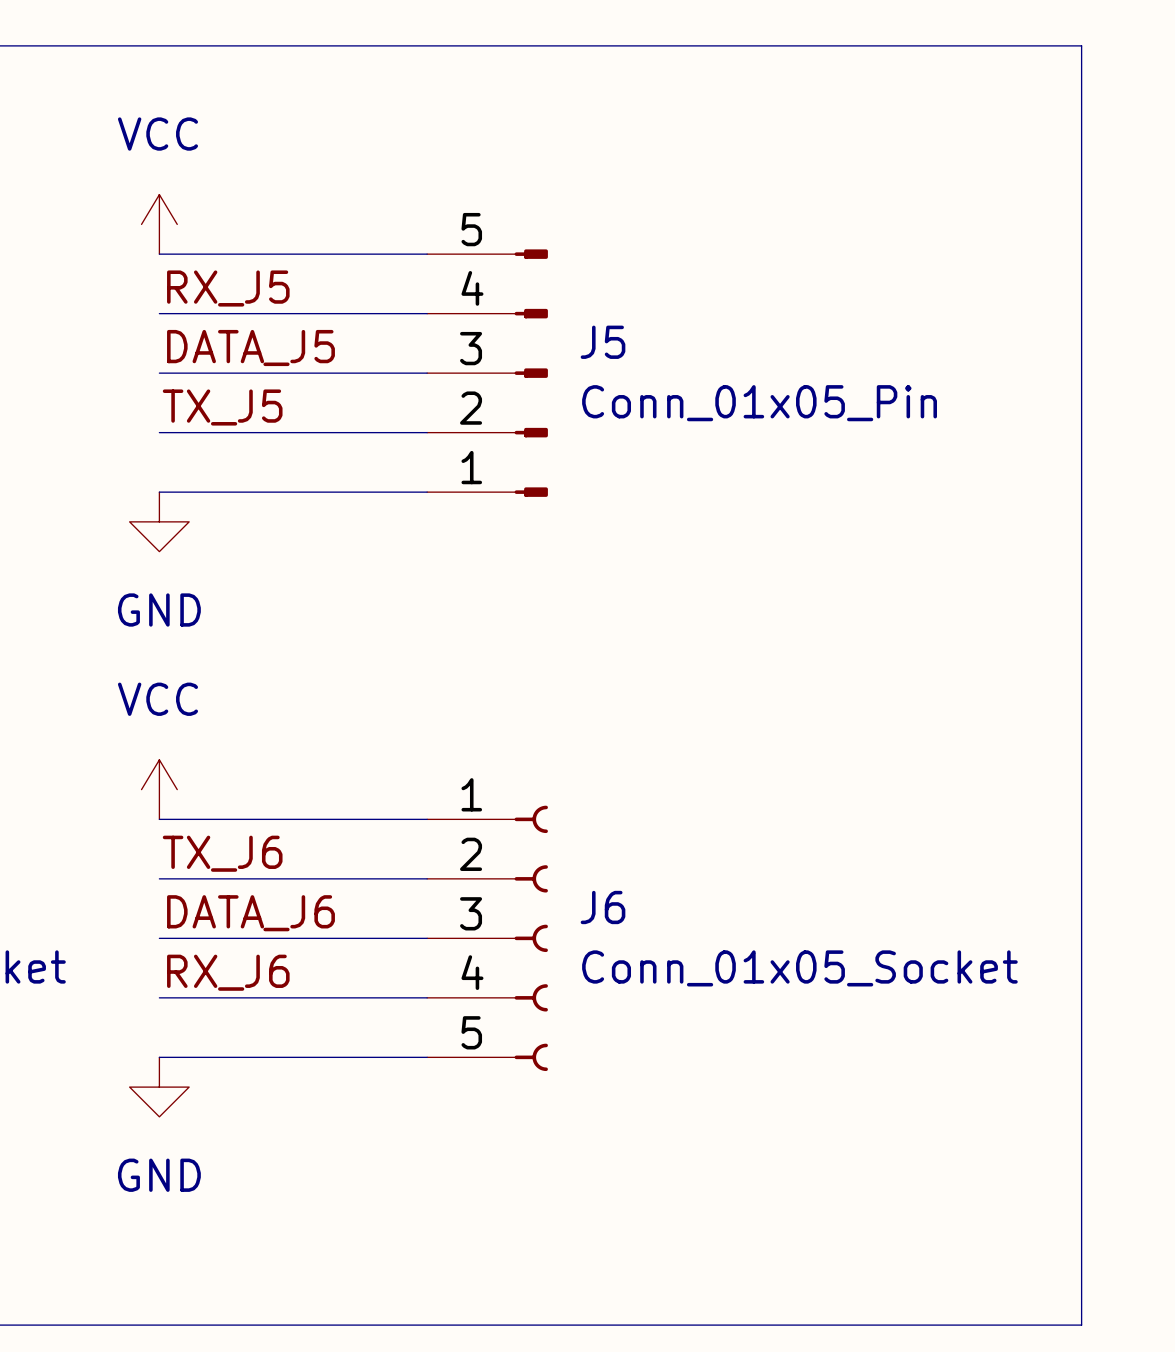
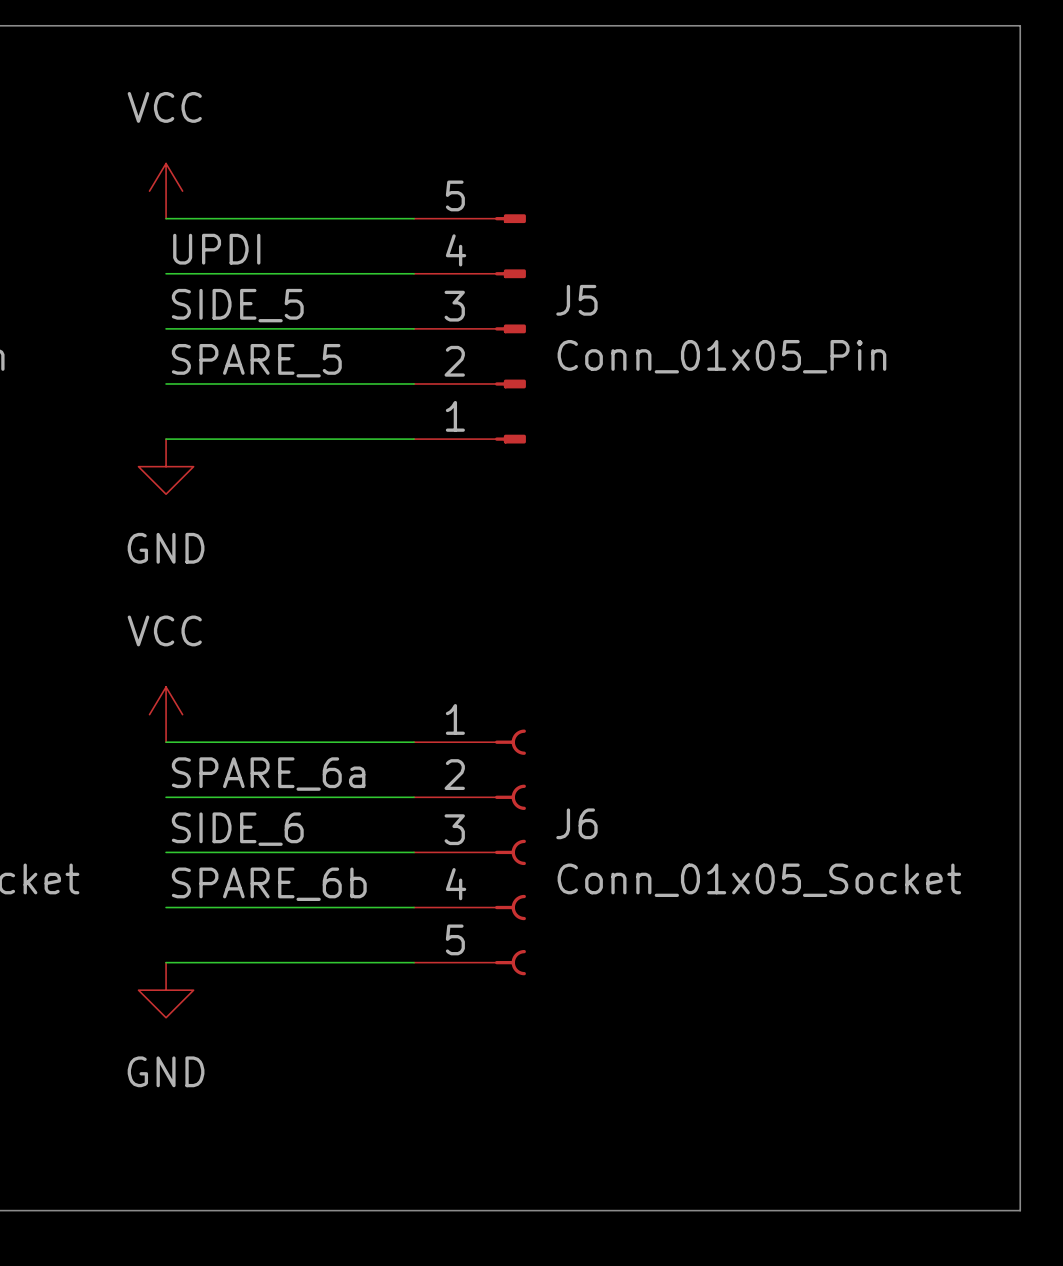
label: RX_J5 (228, 288) -> UPDI (216, 249)
label: DATA_J5 (250, 348) -> SIDE_5 (237, 305)
label: TX_J5 (222, 407) -> SPARE_5 (256, 360)
label: TX_J6 (222, 853) -> SPARE_6a (268, 774)
label: DATA_J6 (250, 913) -> SIDE_6 (237, 829)
label: RX_J6 (228, 972) -> SPARE_6b (269, 884)

